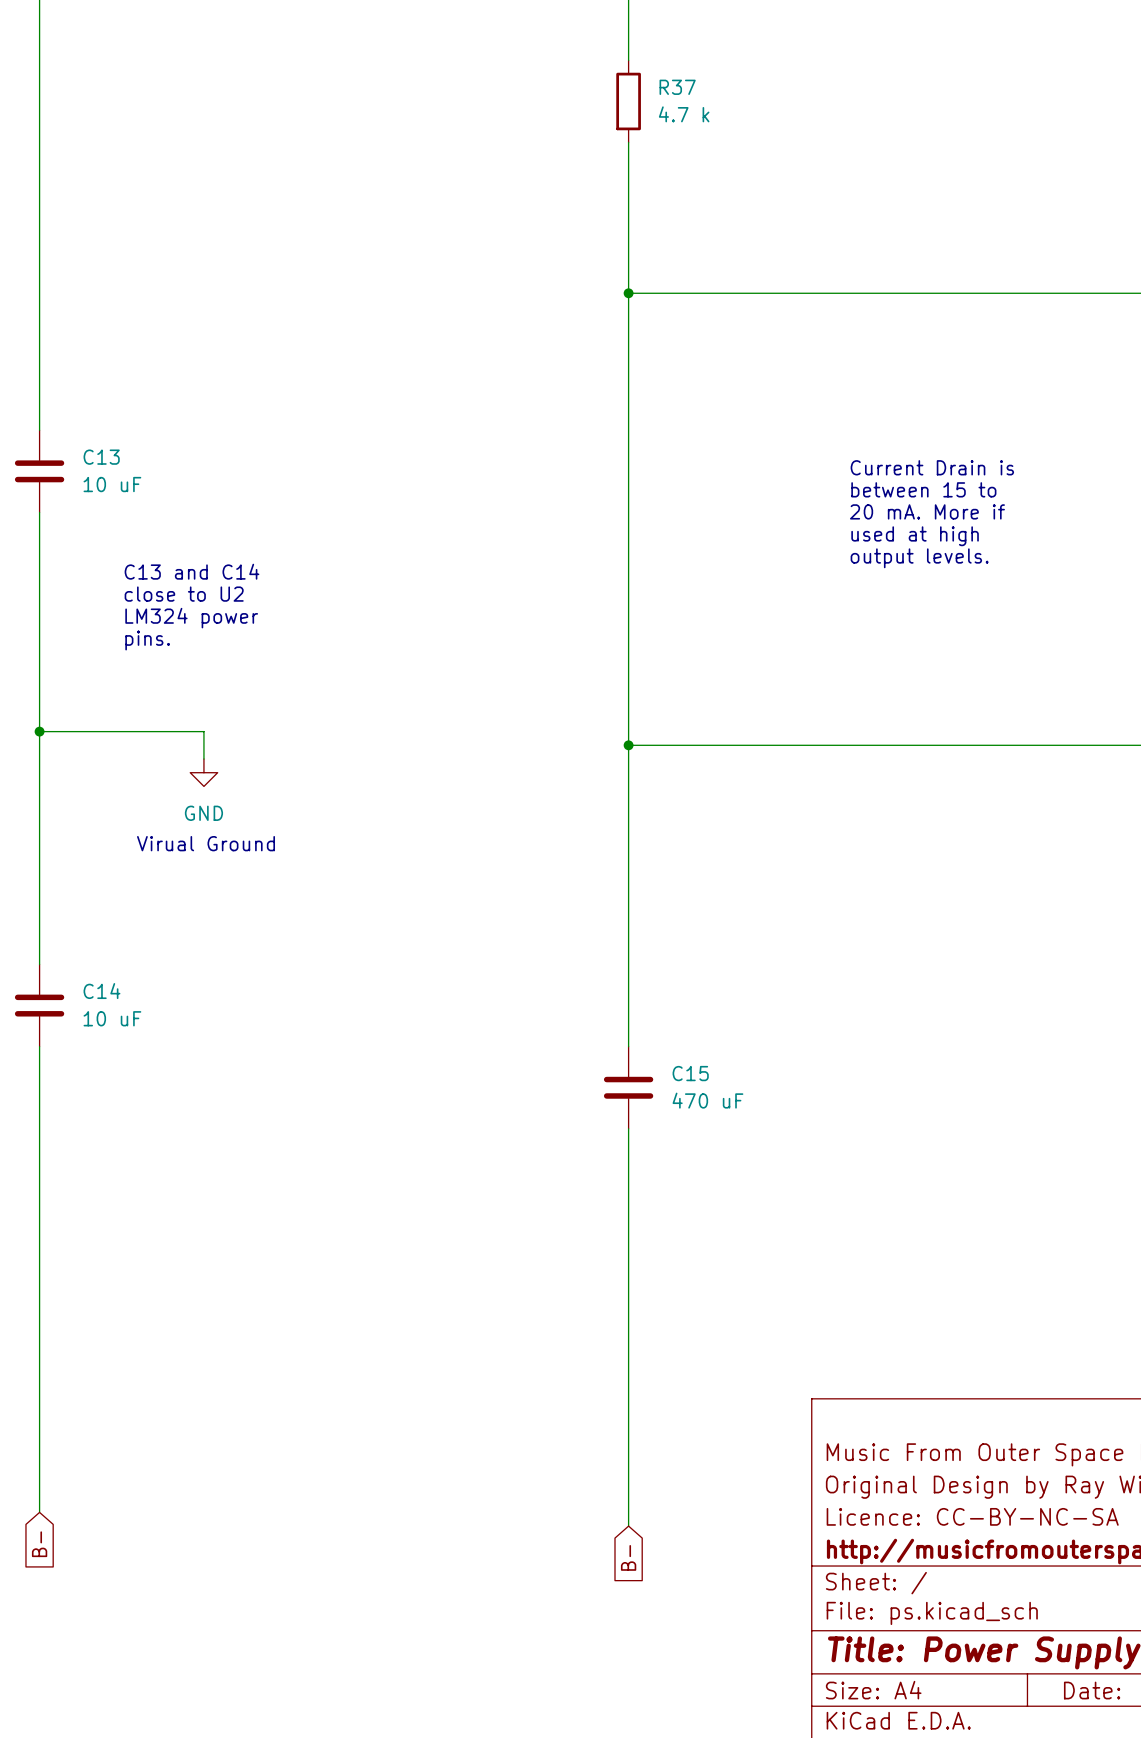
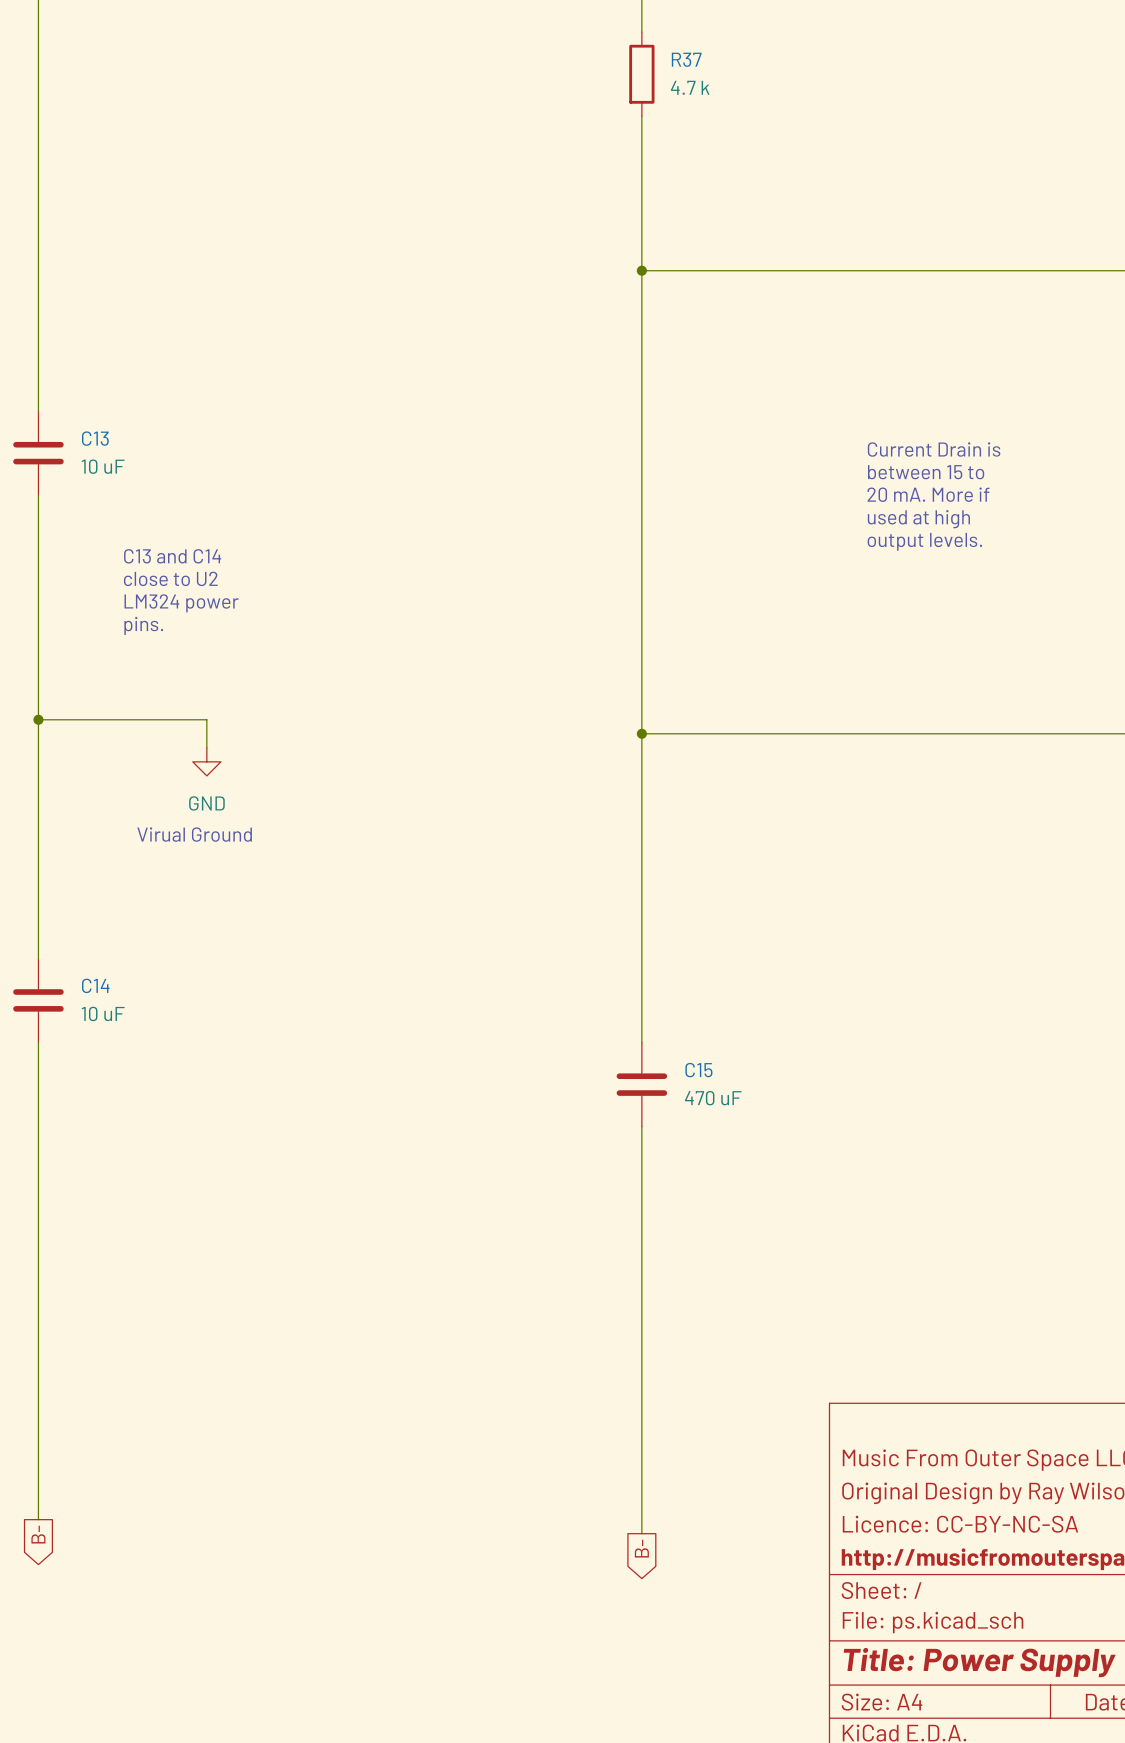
global label shape: input (39, 1544) -> output (38, 1534)
global label shape: input (628, 1557) -> output (641, 1548)

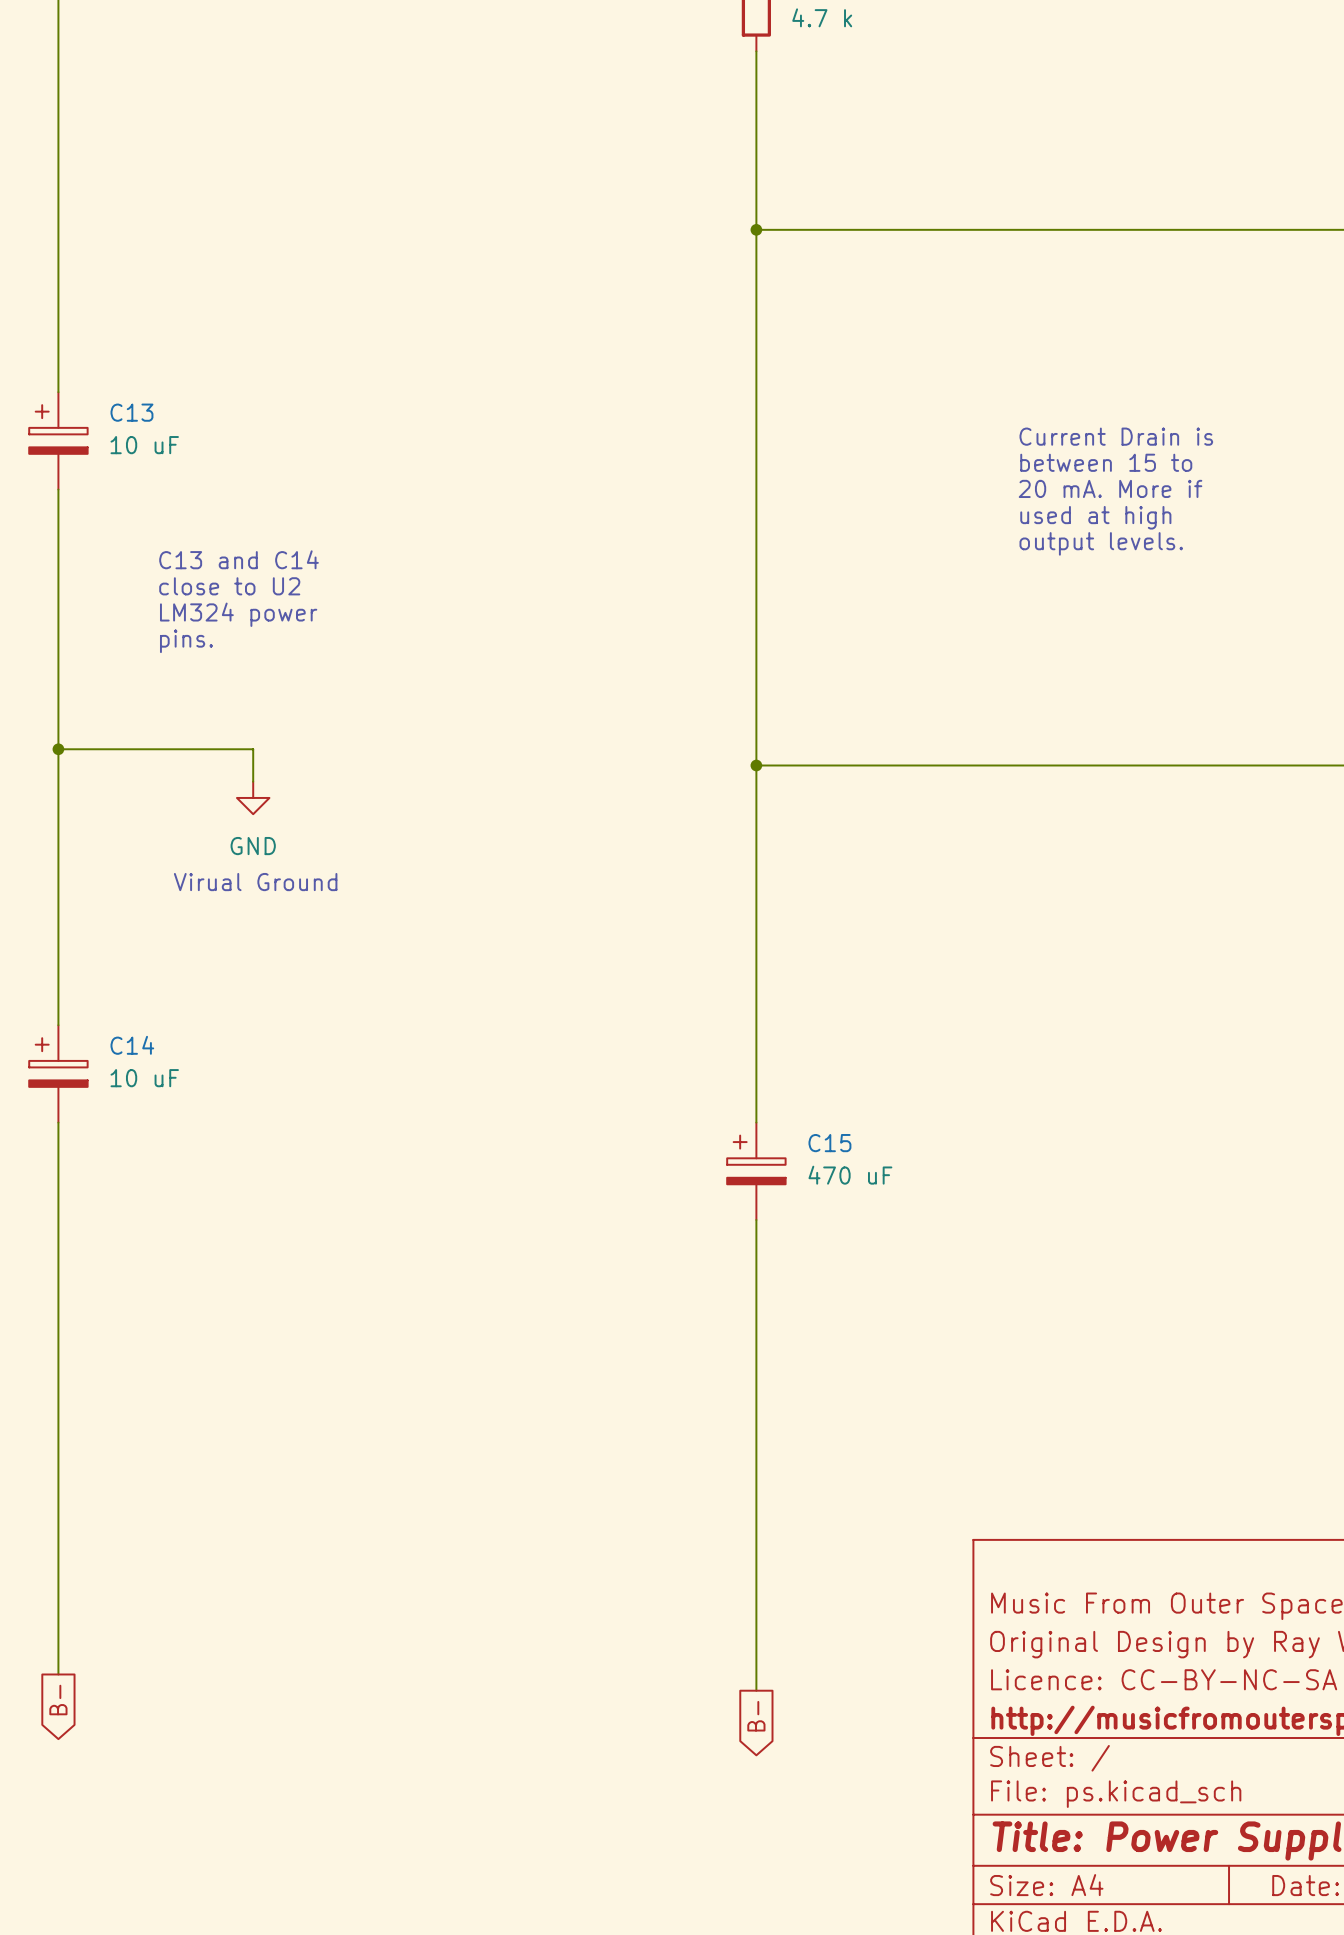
C13 symbol: [13, 411, 64, 496] -> [29, 392, 88, 490]
C14 symbol: [13, 958, 64, 1043] -> [29, 1025, 88, 1123]
C15 symbol: [616, 1042, 668, 1127] -> [727, 1122, 786, 1220]

